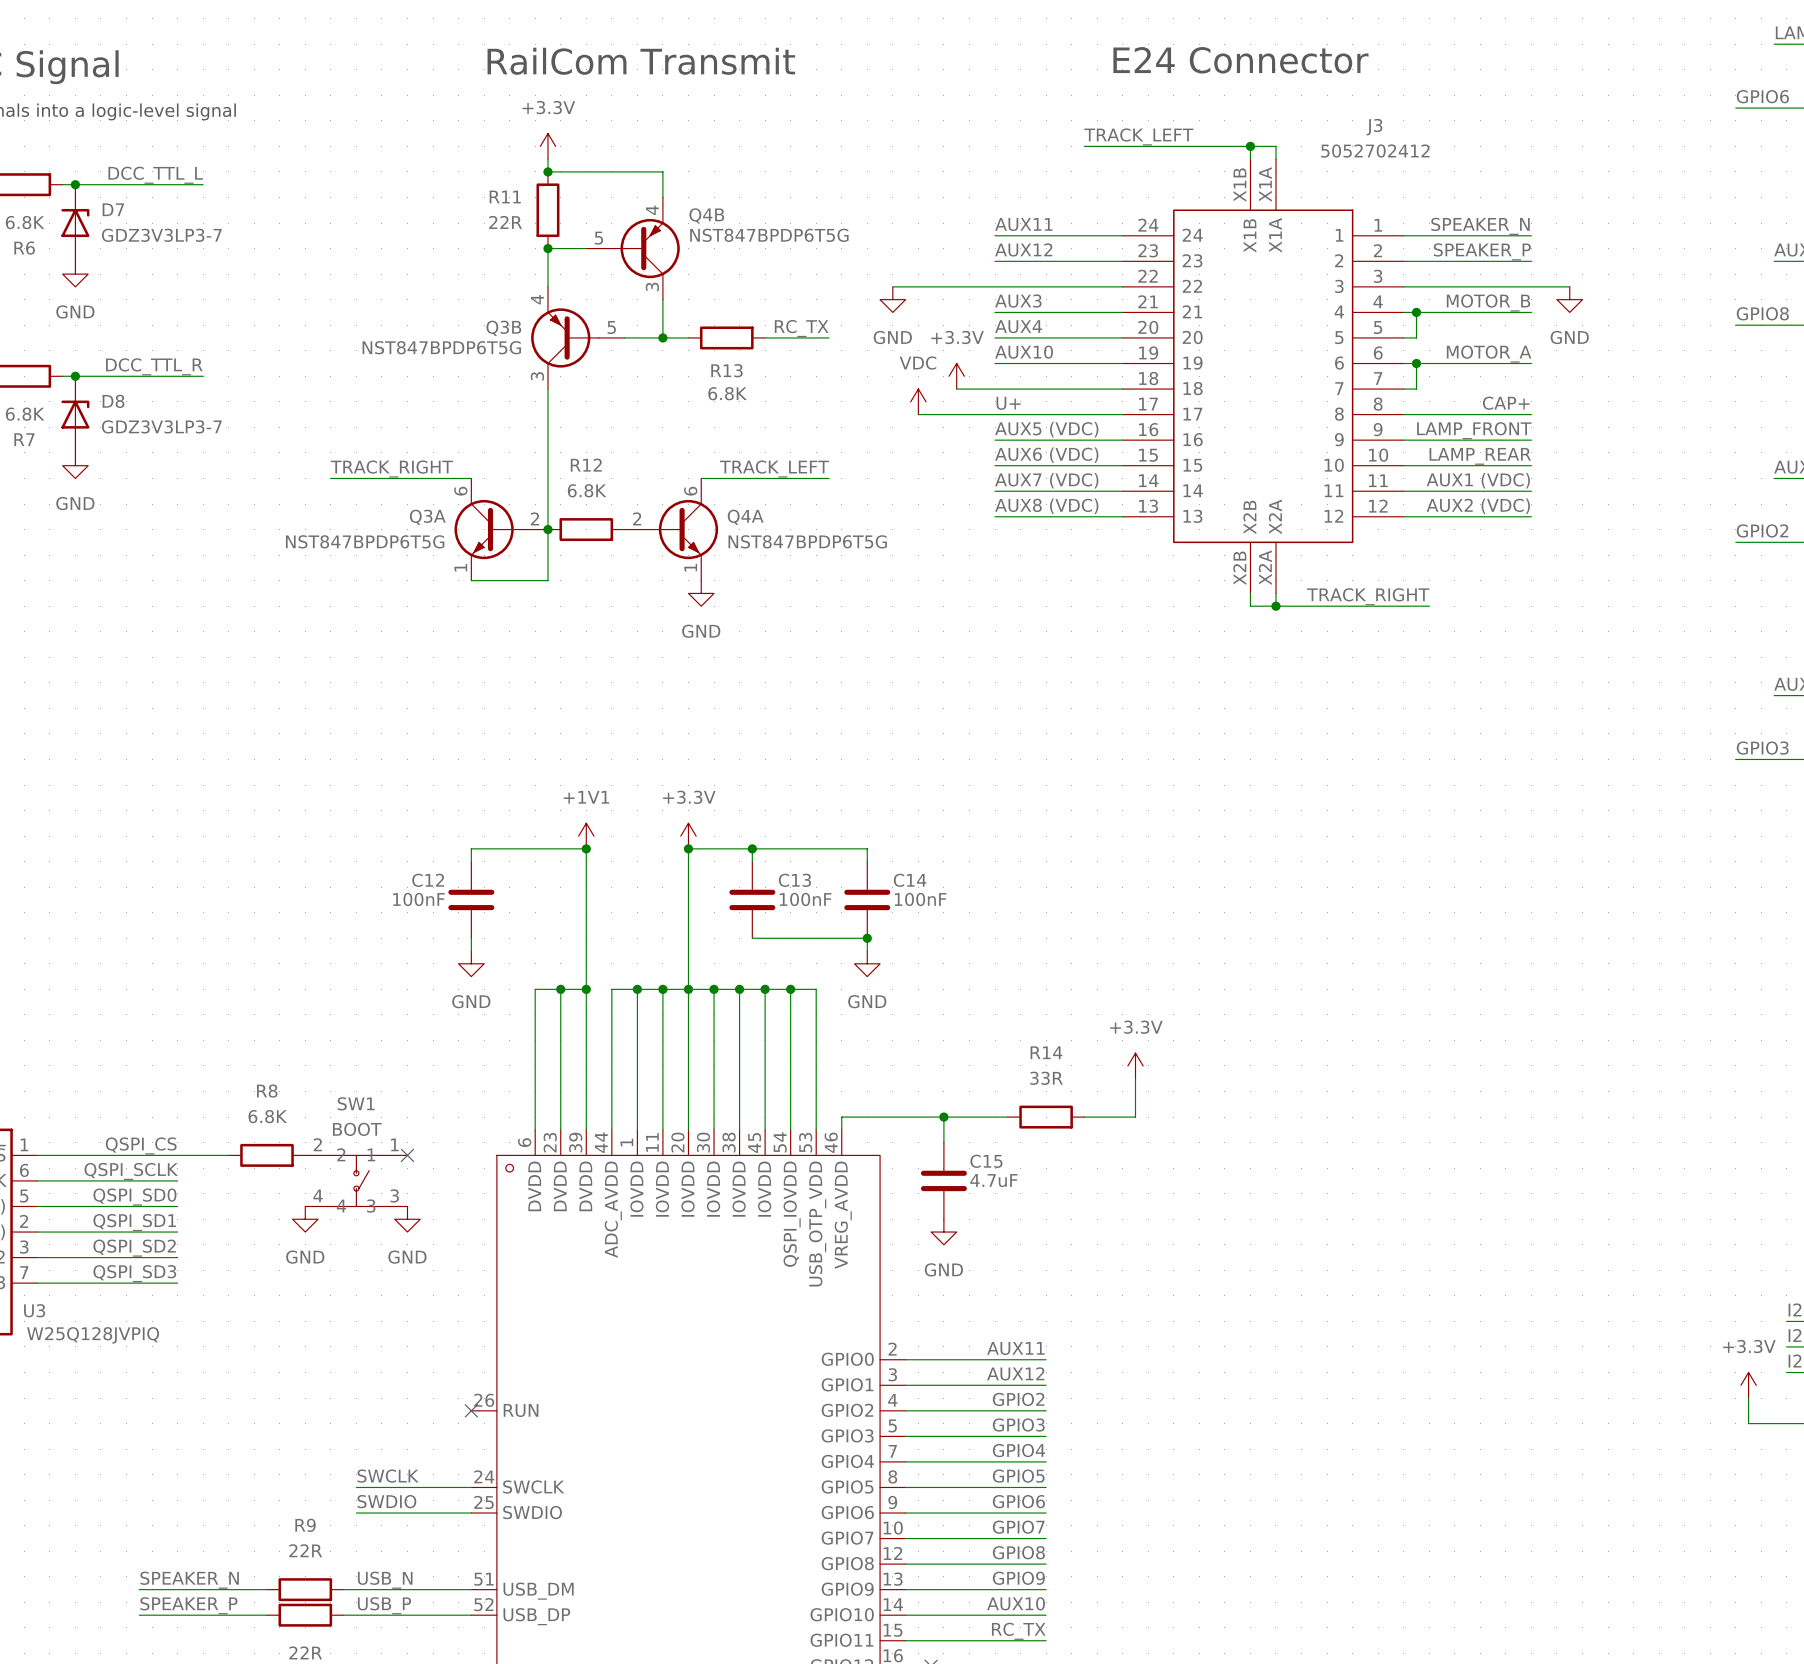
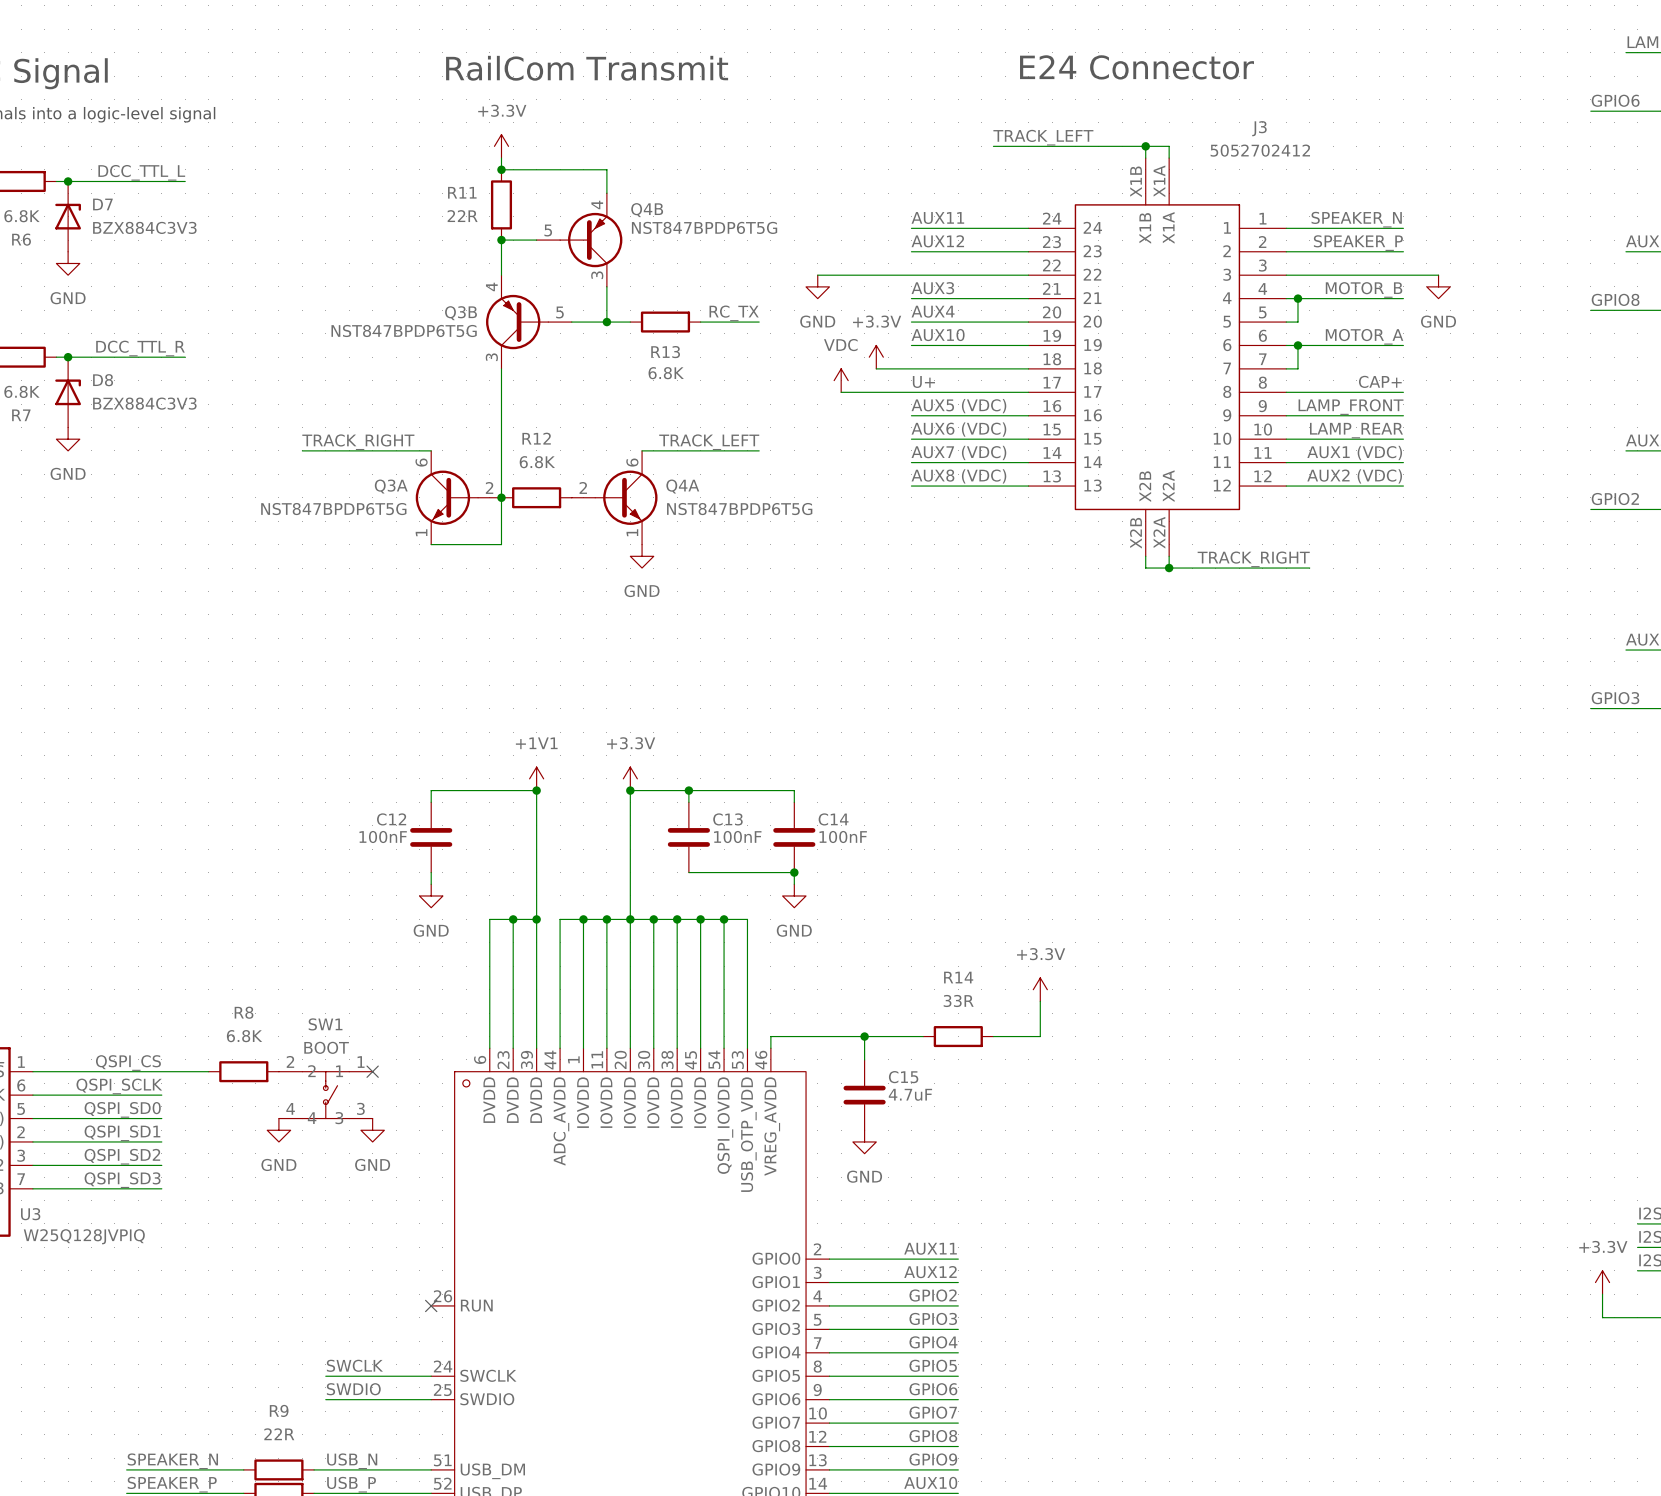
D7 value: GDZ3V3LP3-7 (161, 235) -> BZX884C3V3 (144, 227)
D8 value: GDZ3V3LP3-7 (161, 426) -> BZX884C3V3 (144, 403)

